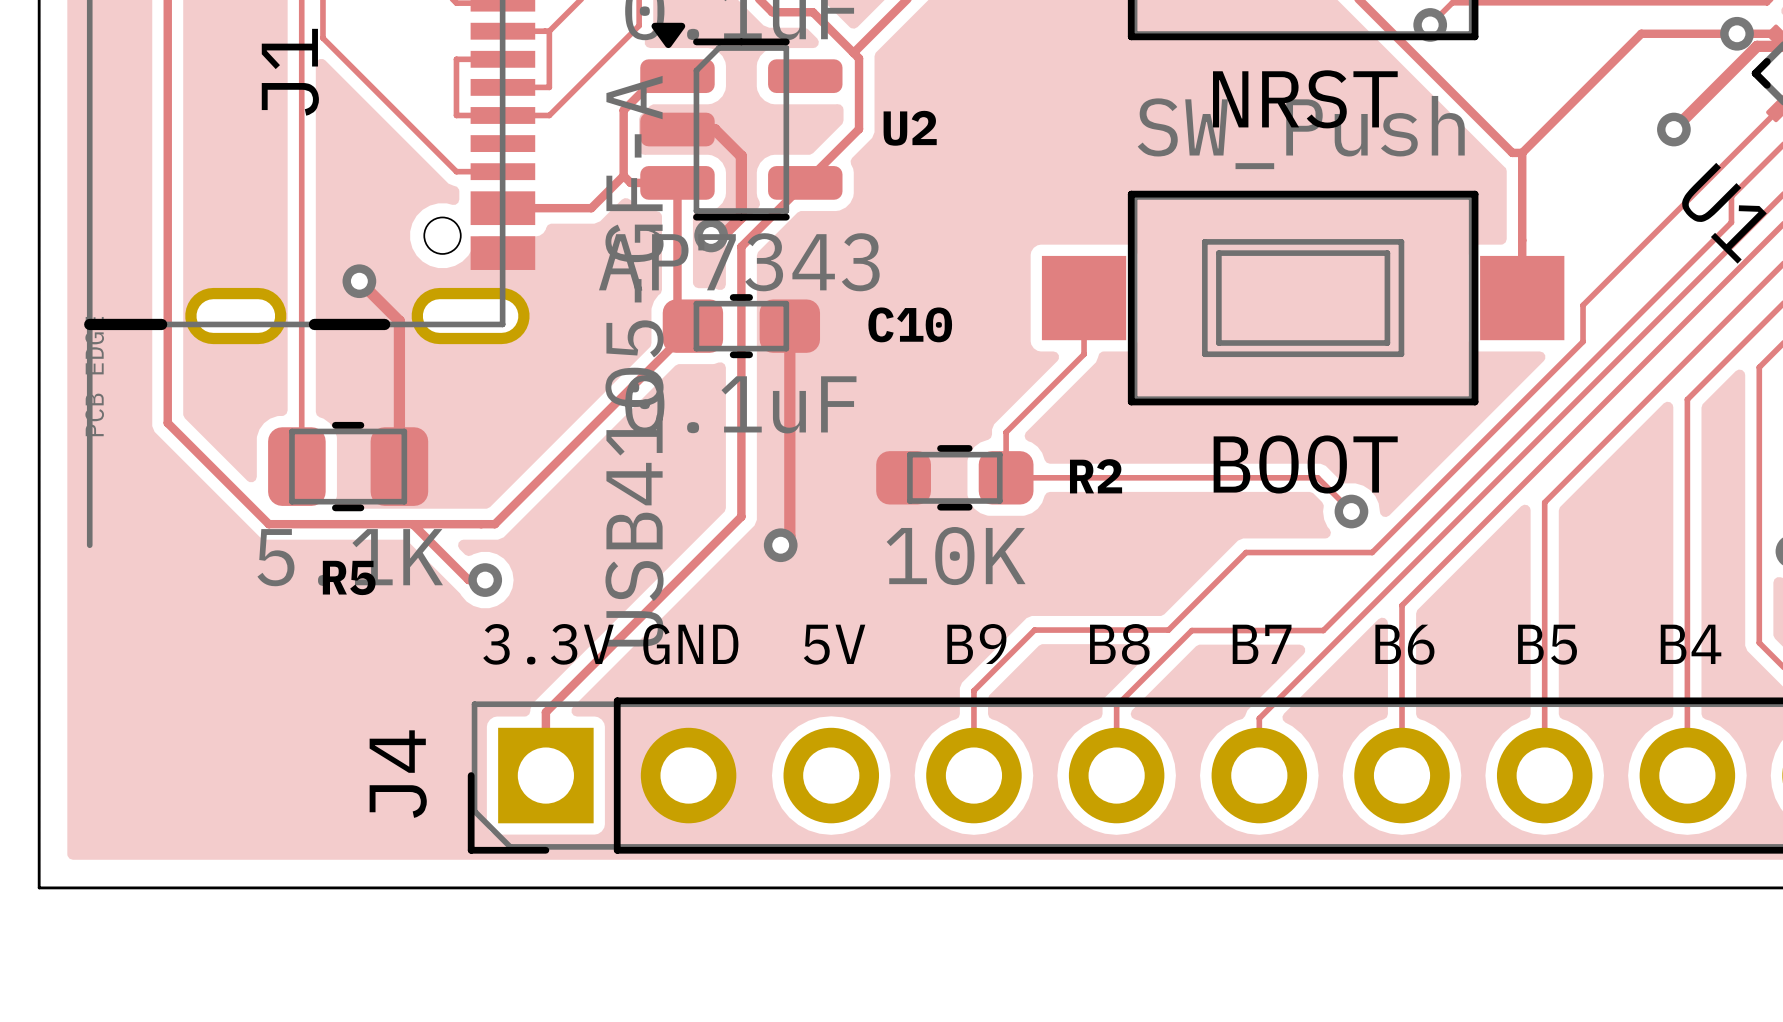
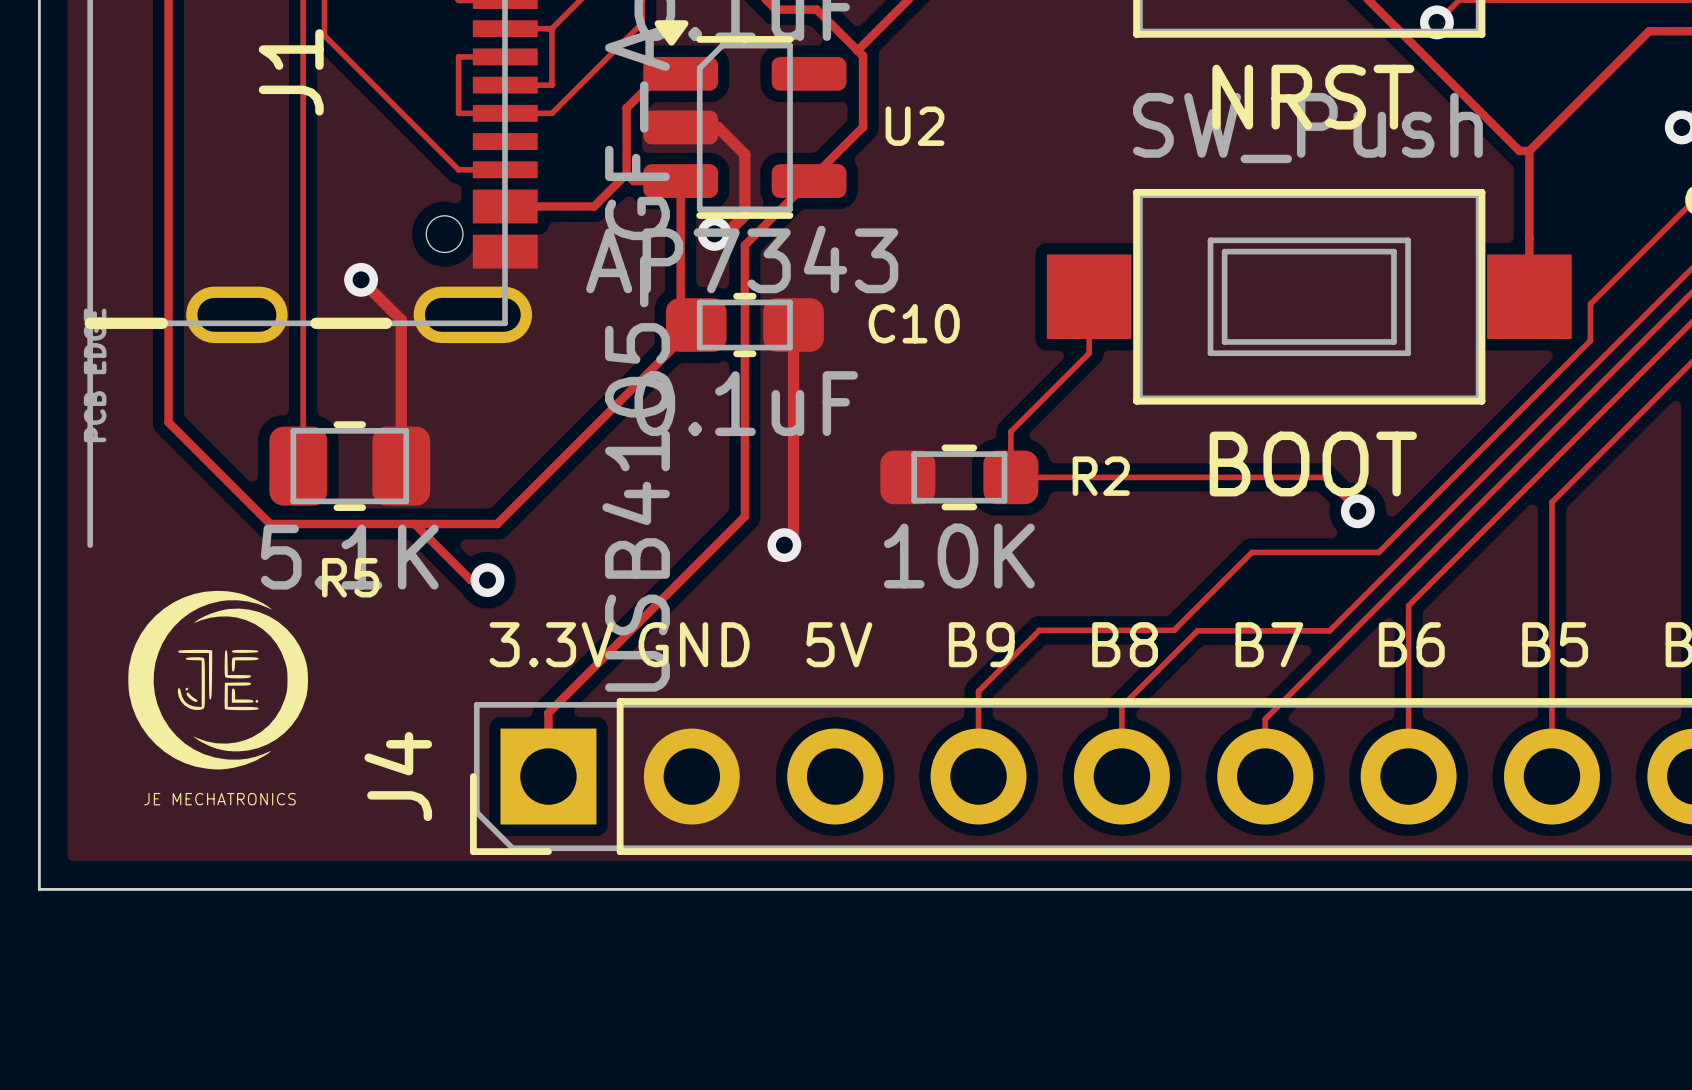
drawing: none -> [128, 590, 308, 770]
text: none -> JE MECHATRONICS (219, 799)

